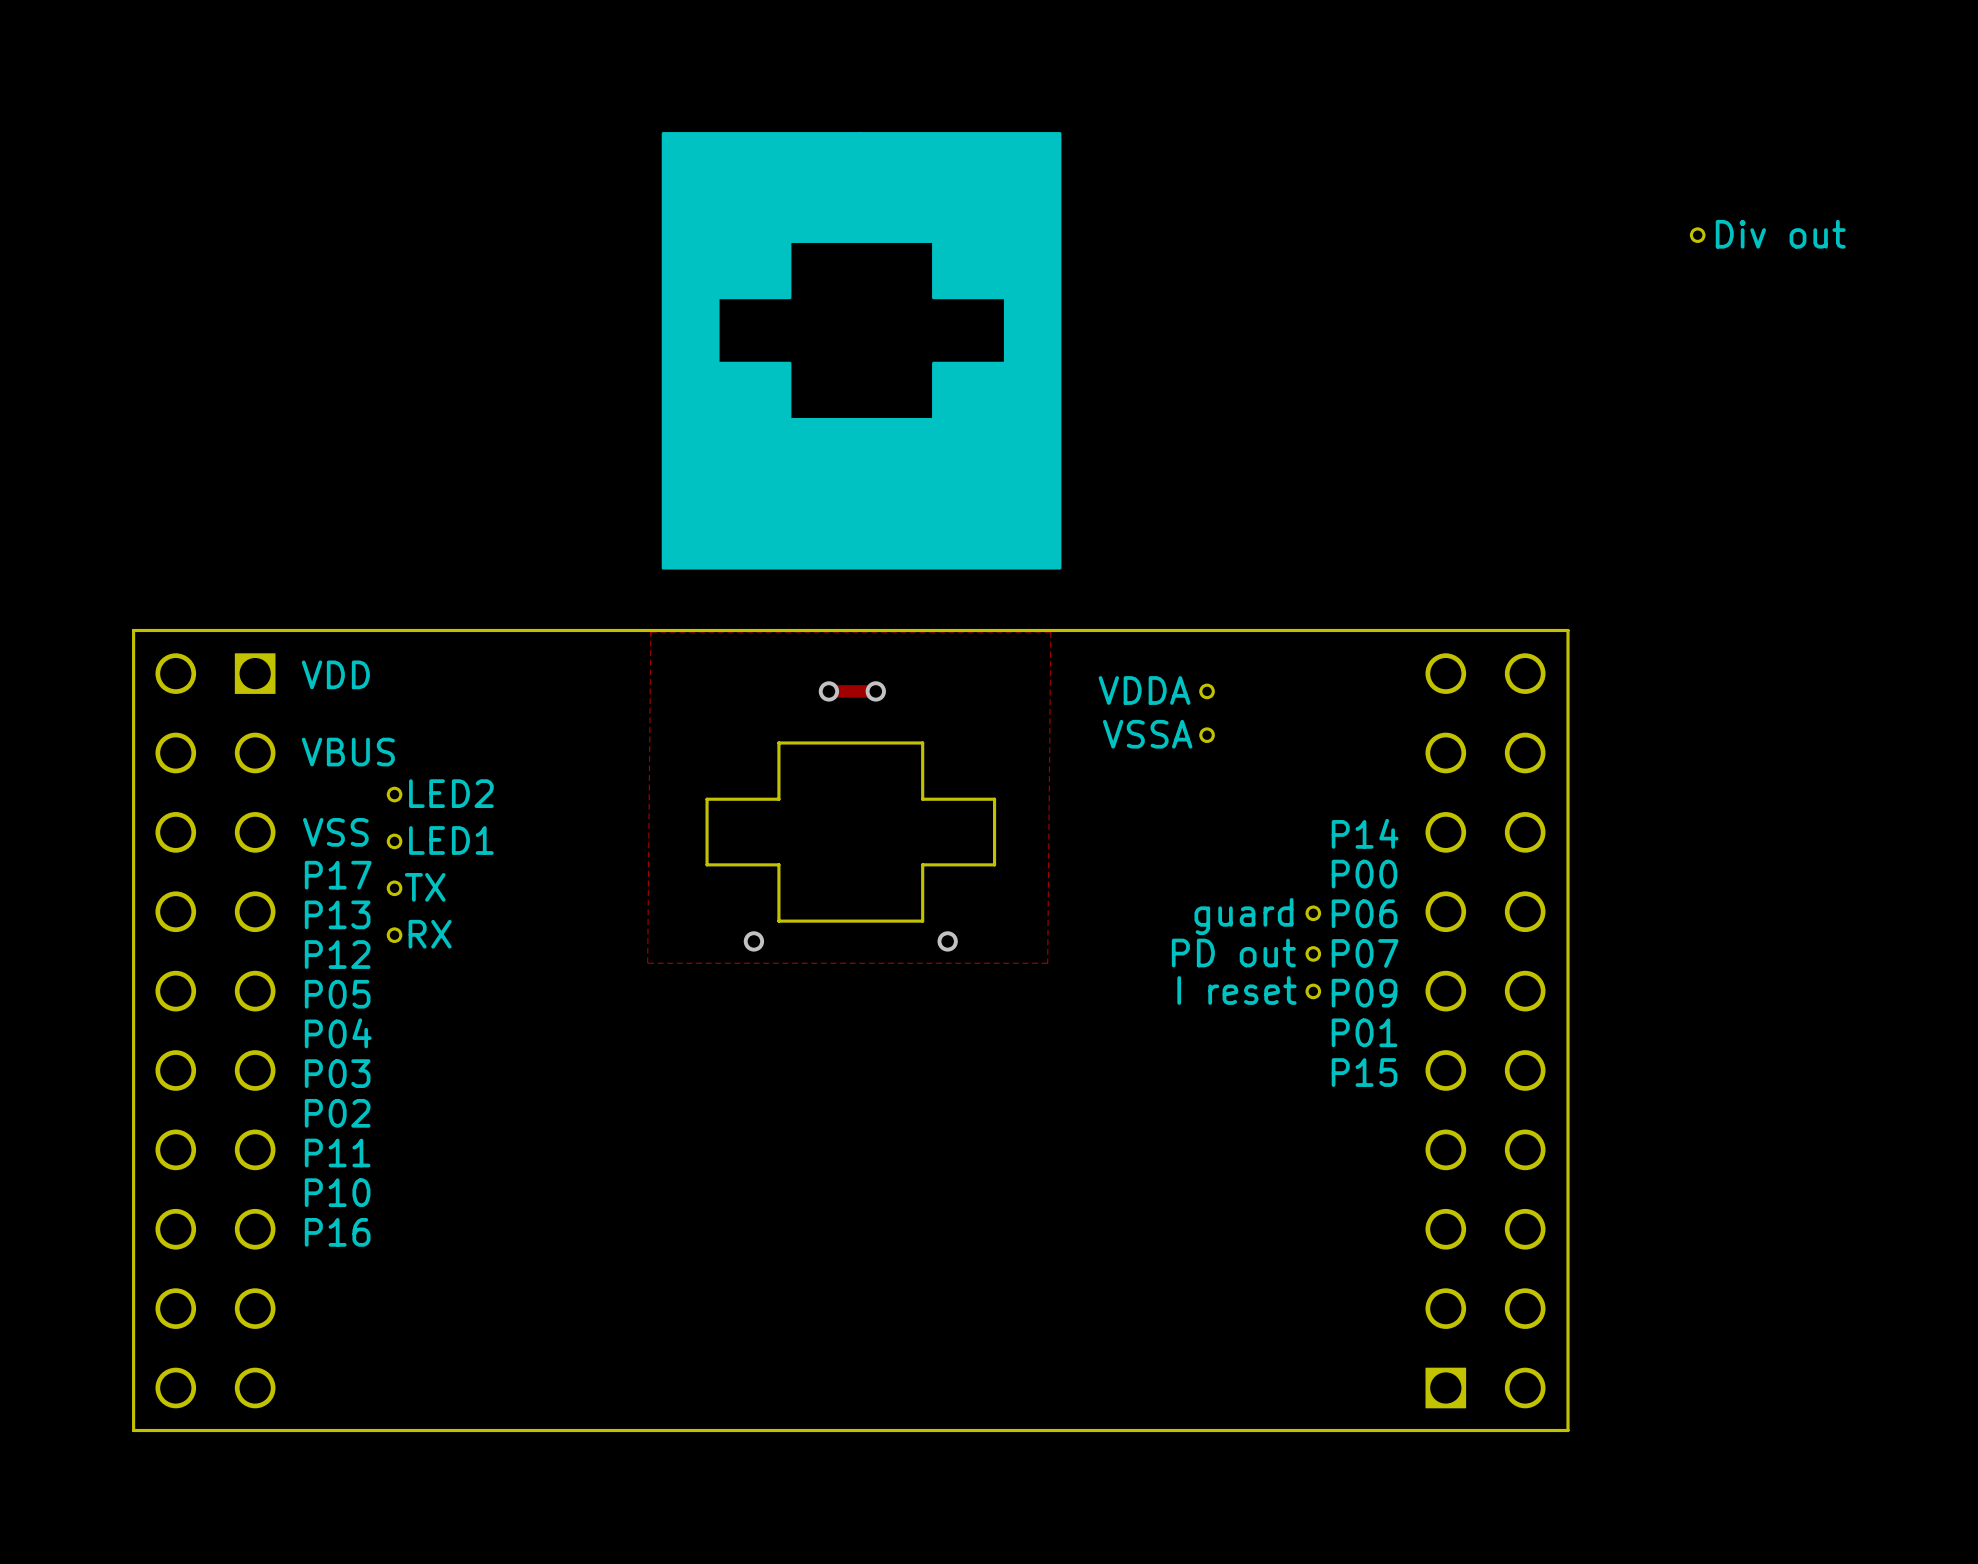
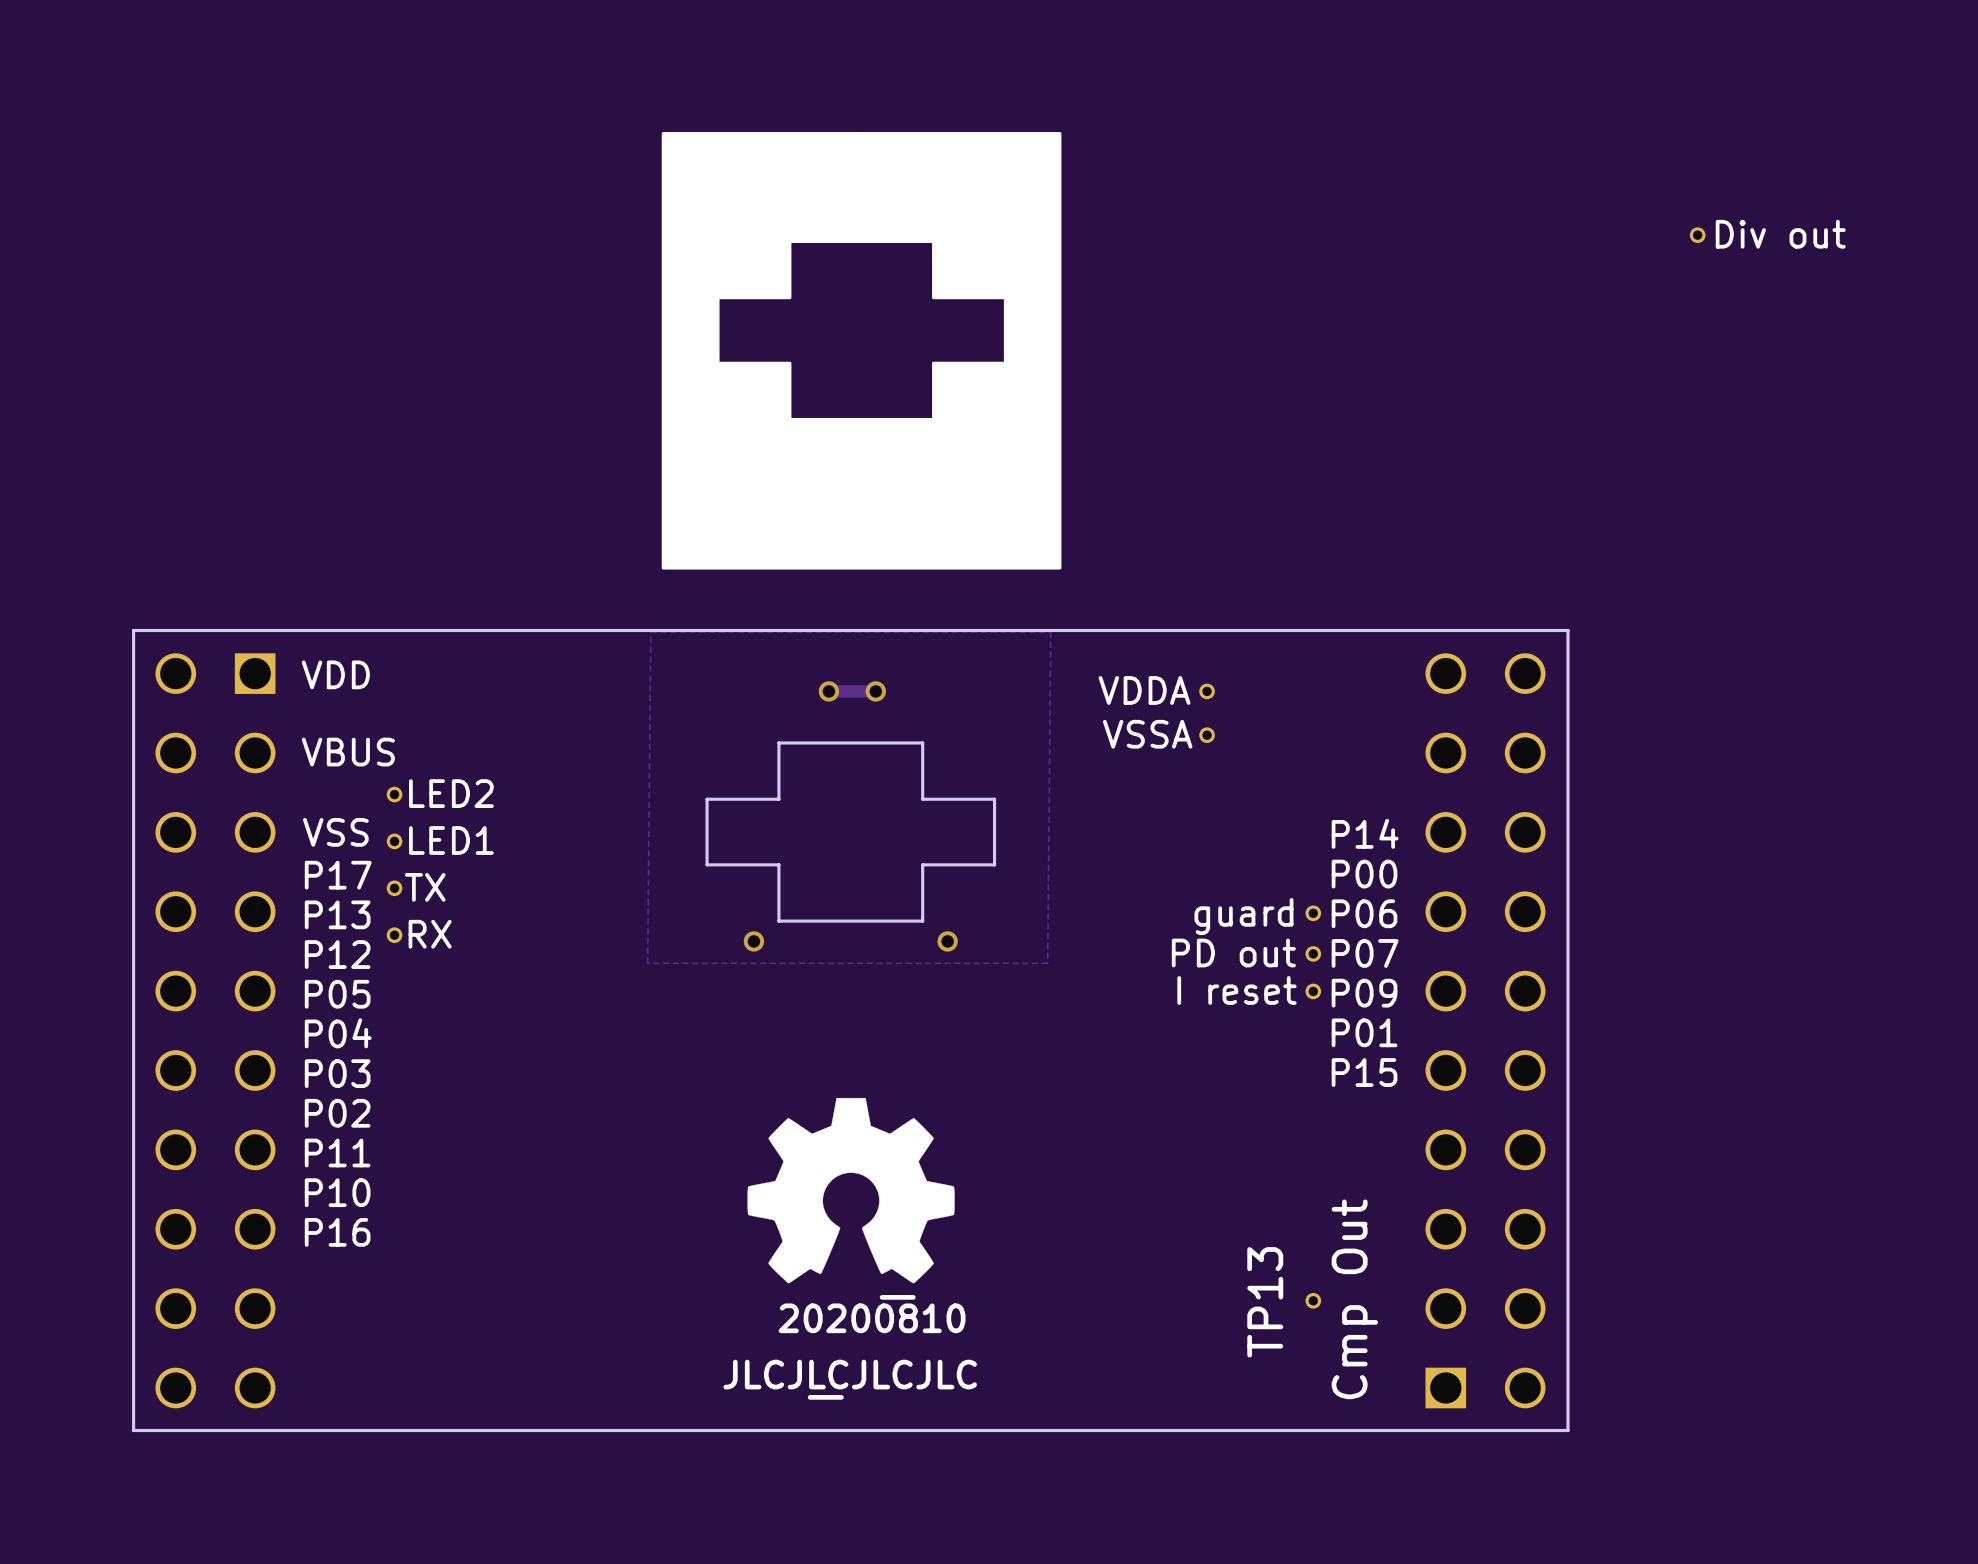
drawing: none -> [747, 1097, 955, 1400]
TP13: none -> Cmp Out (1313, 1300)

